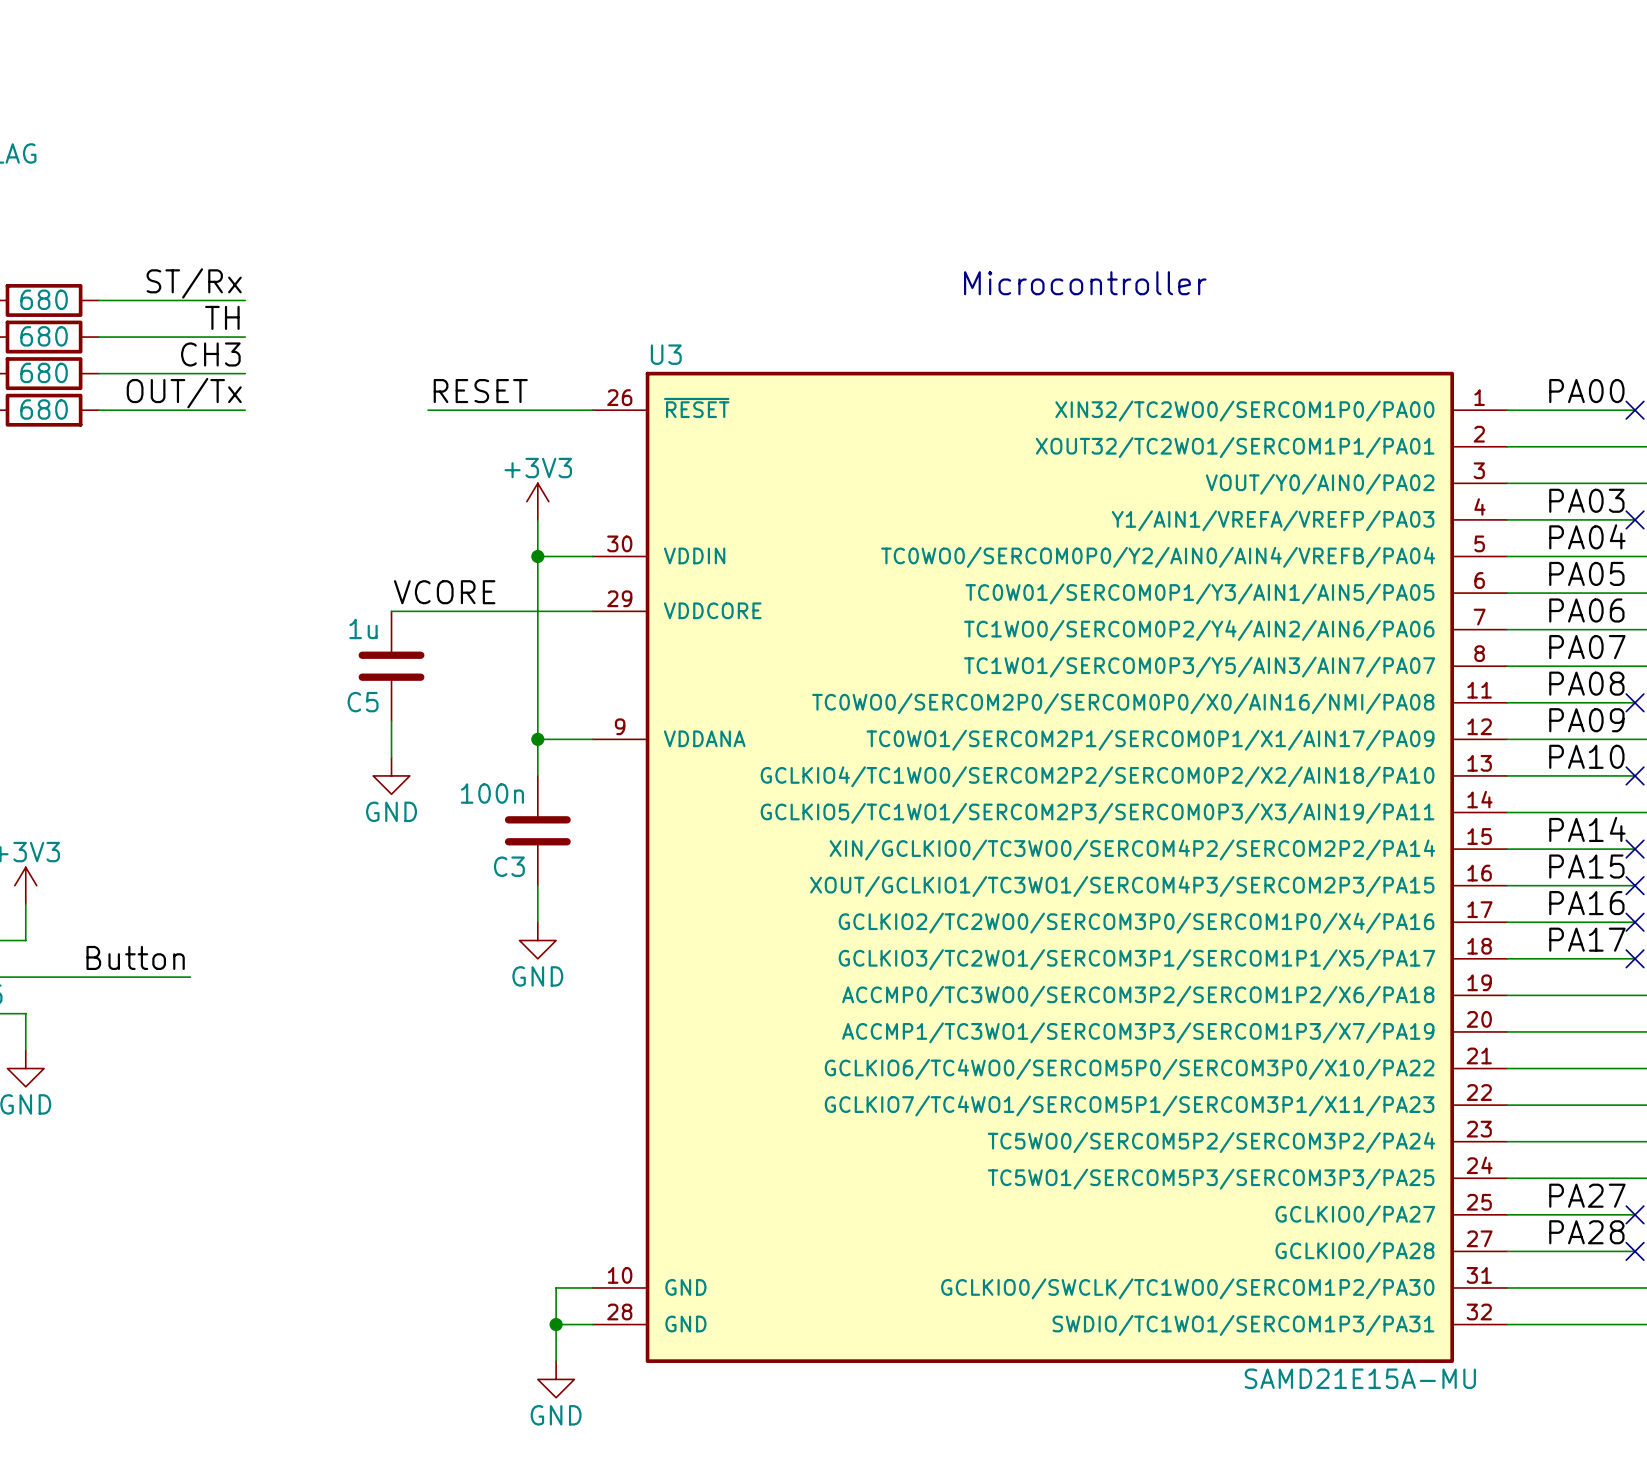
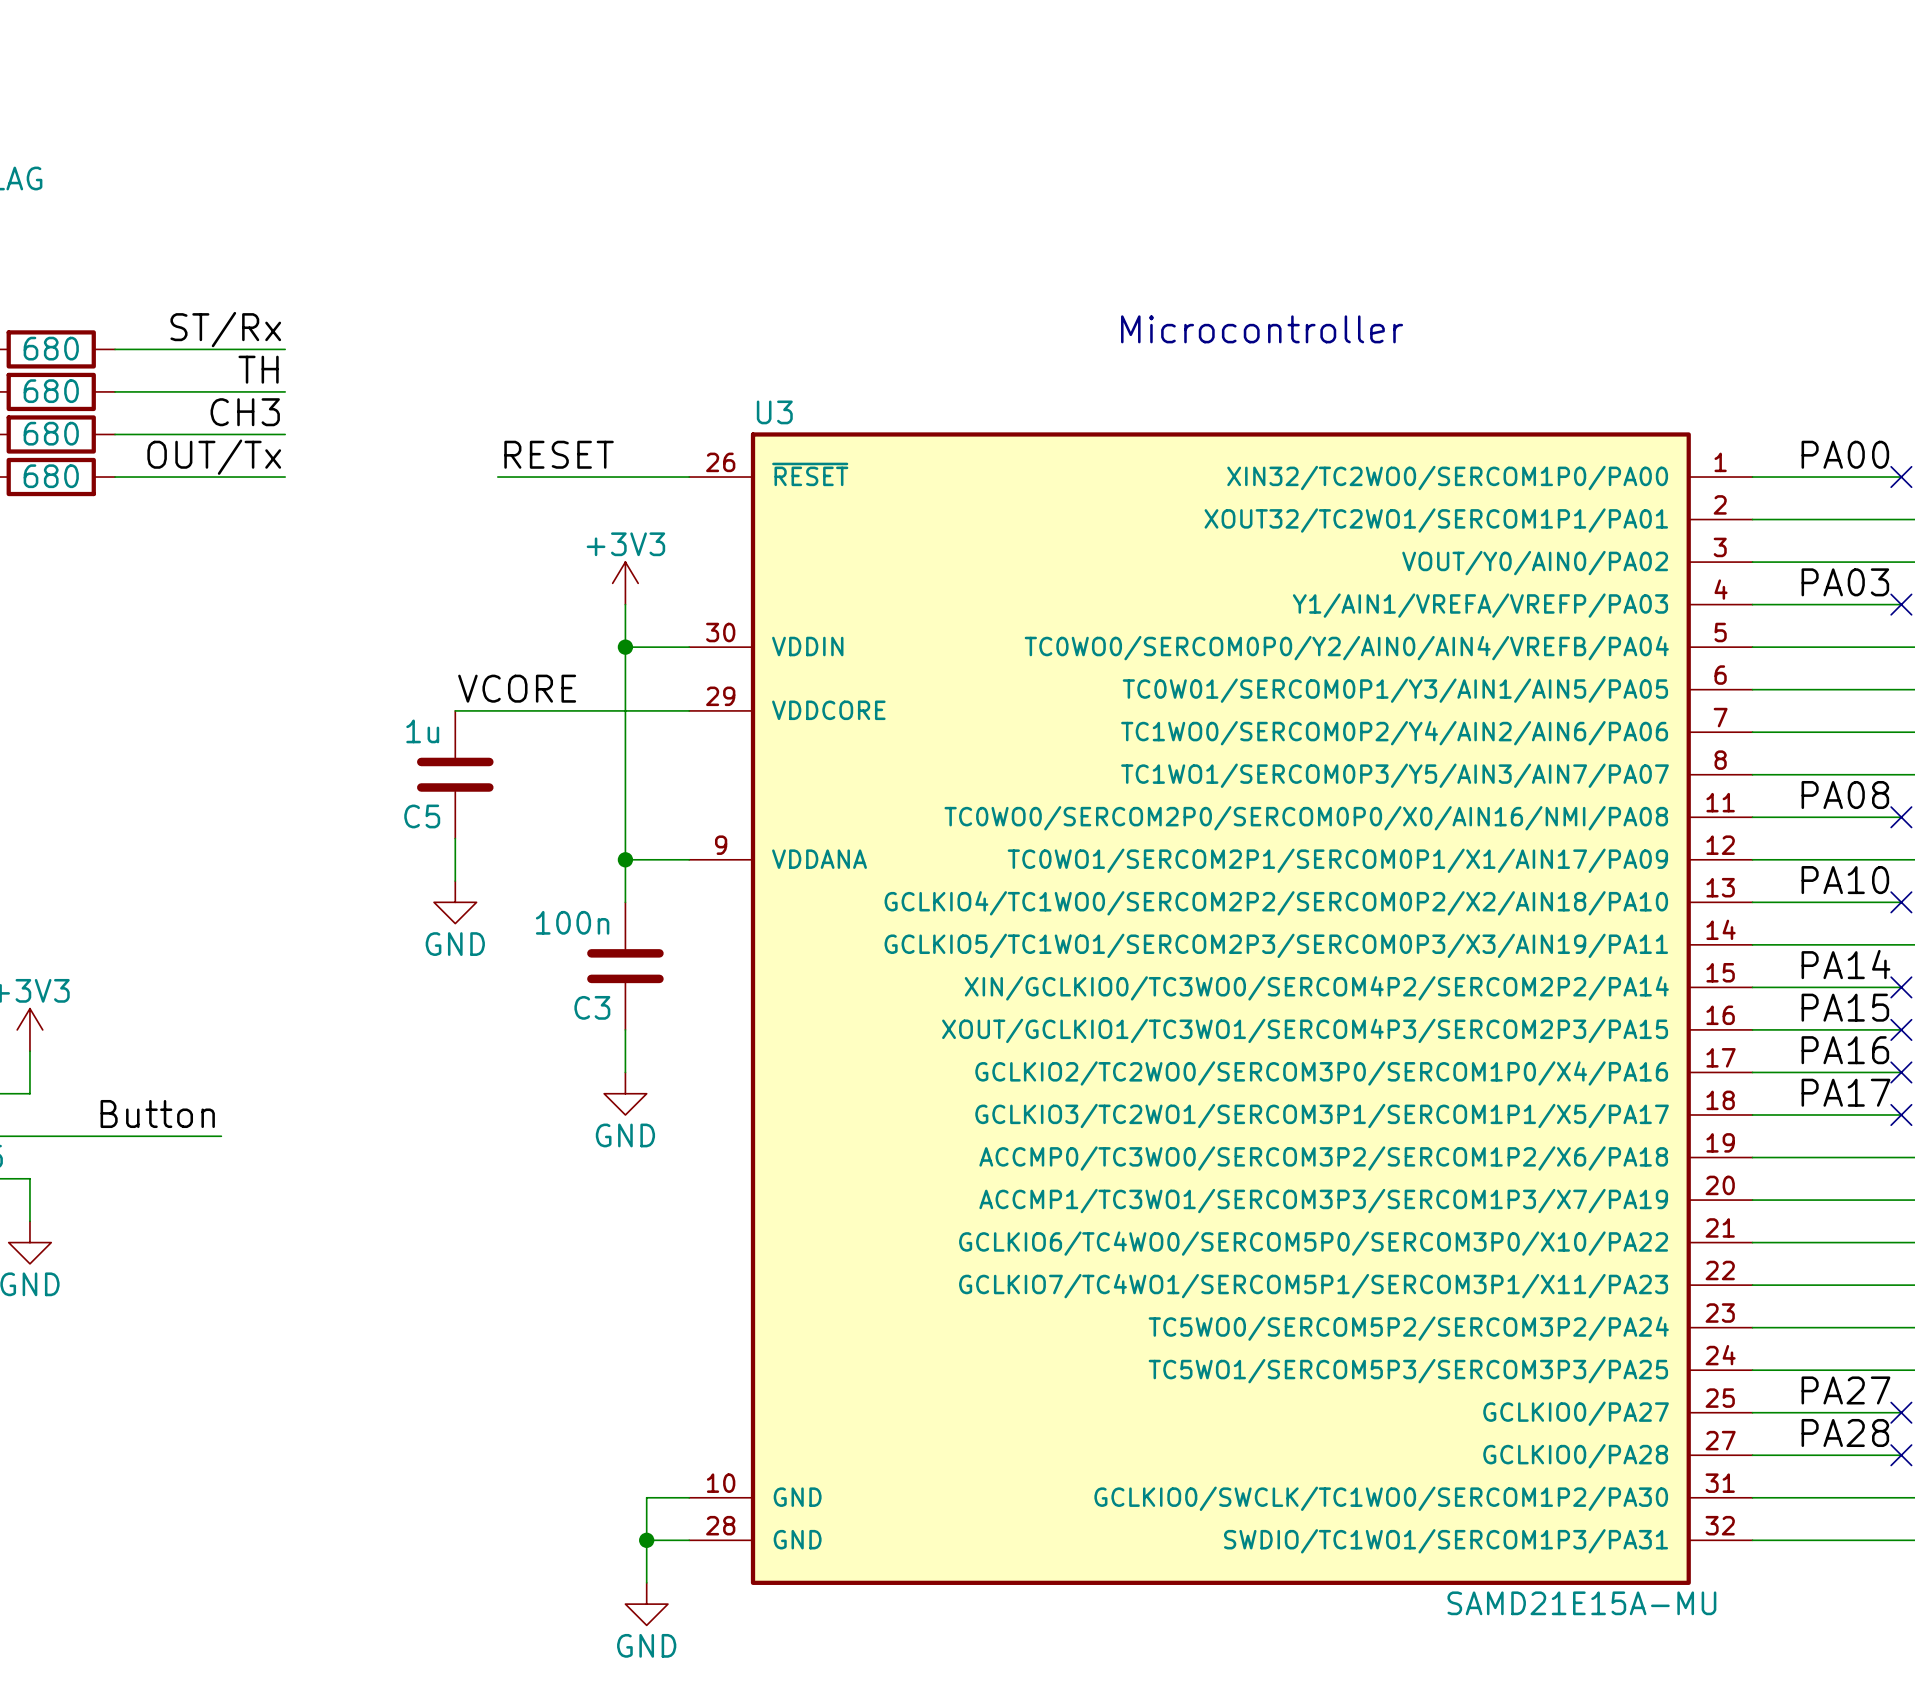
label: PA04 (1587, 536) -> none
label: PA05 (1586, 573) -> none
label: PA06 (1586, 610) -> none
label: PA07 (1587, 647) -> none
label: PA09 (1586, 720) -> none

